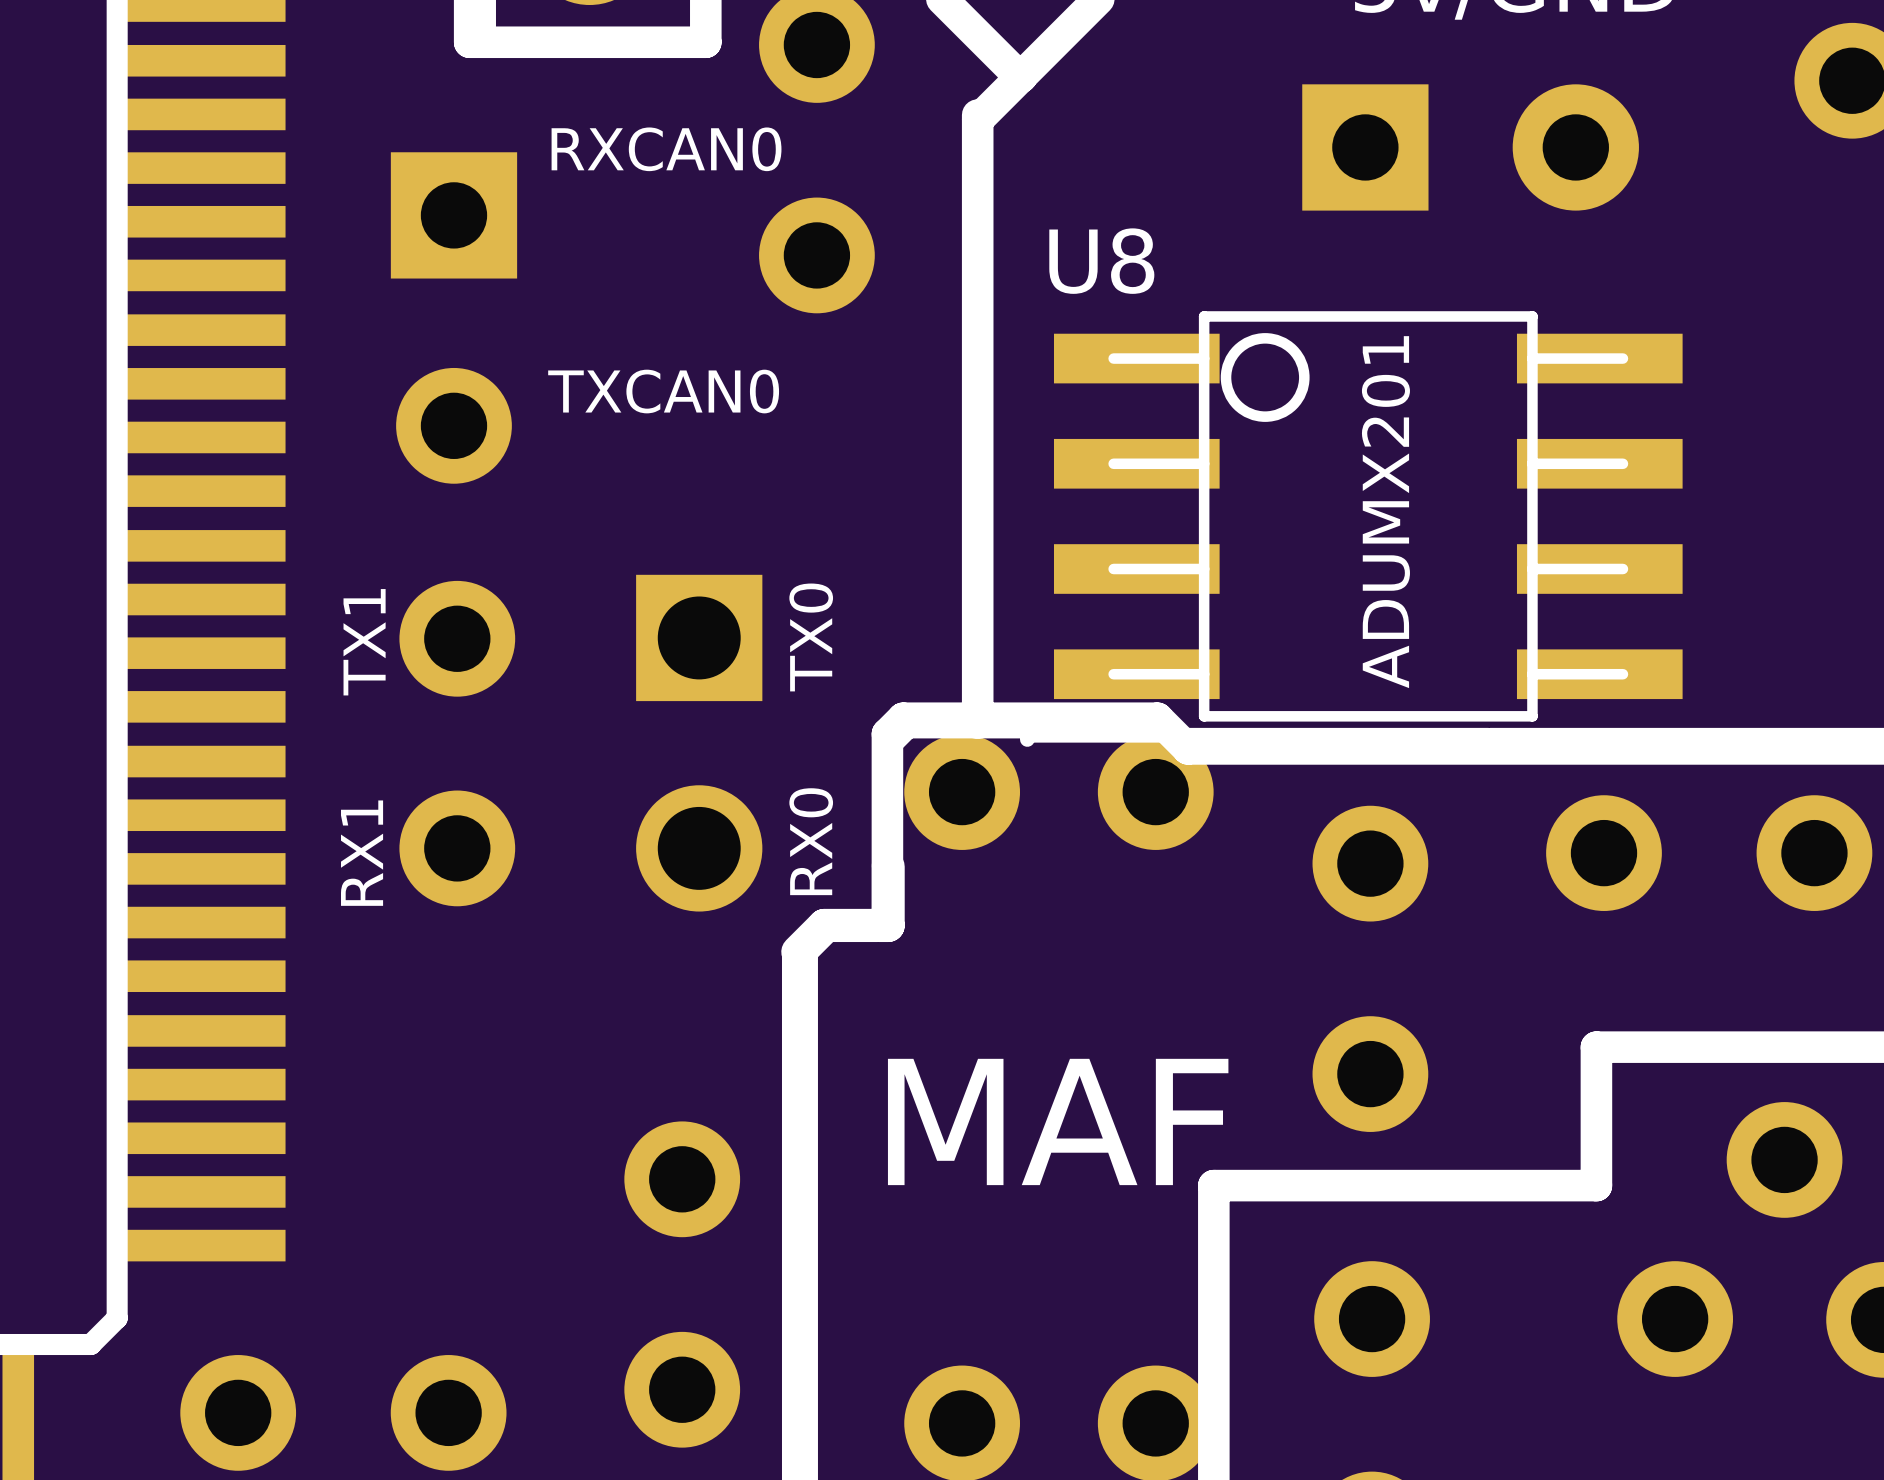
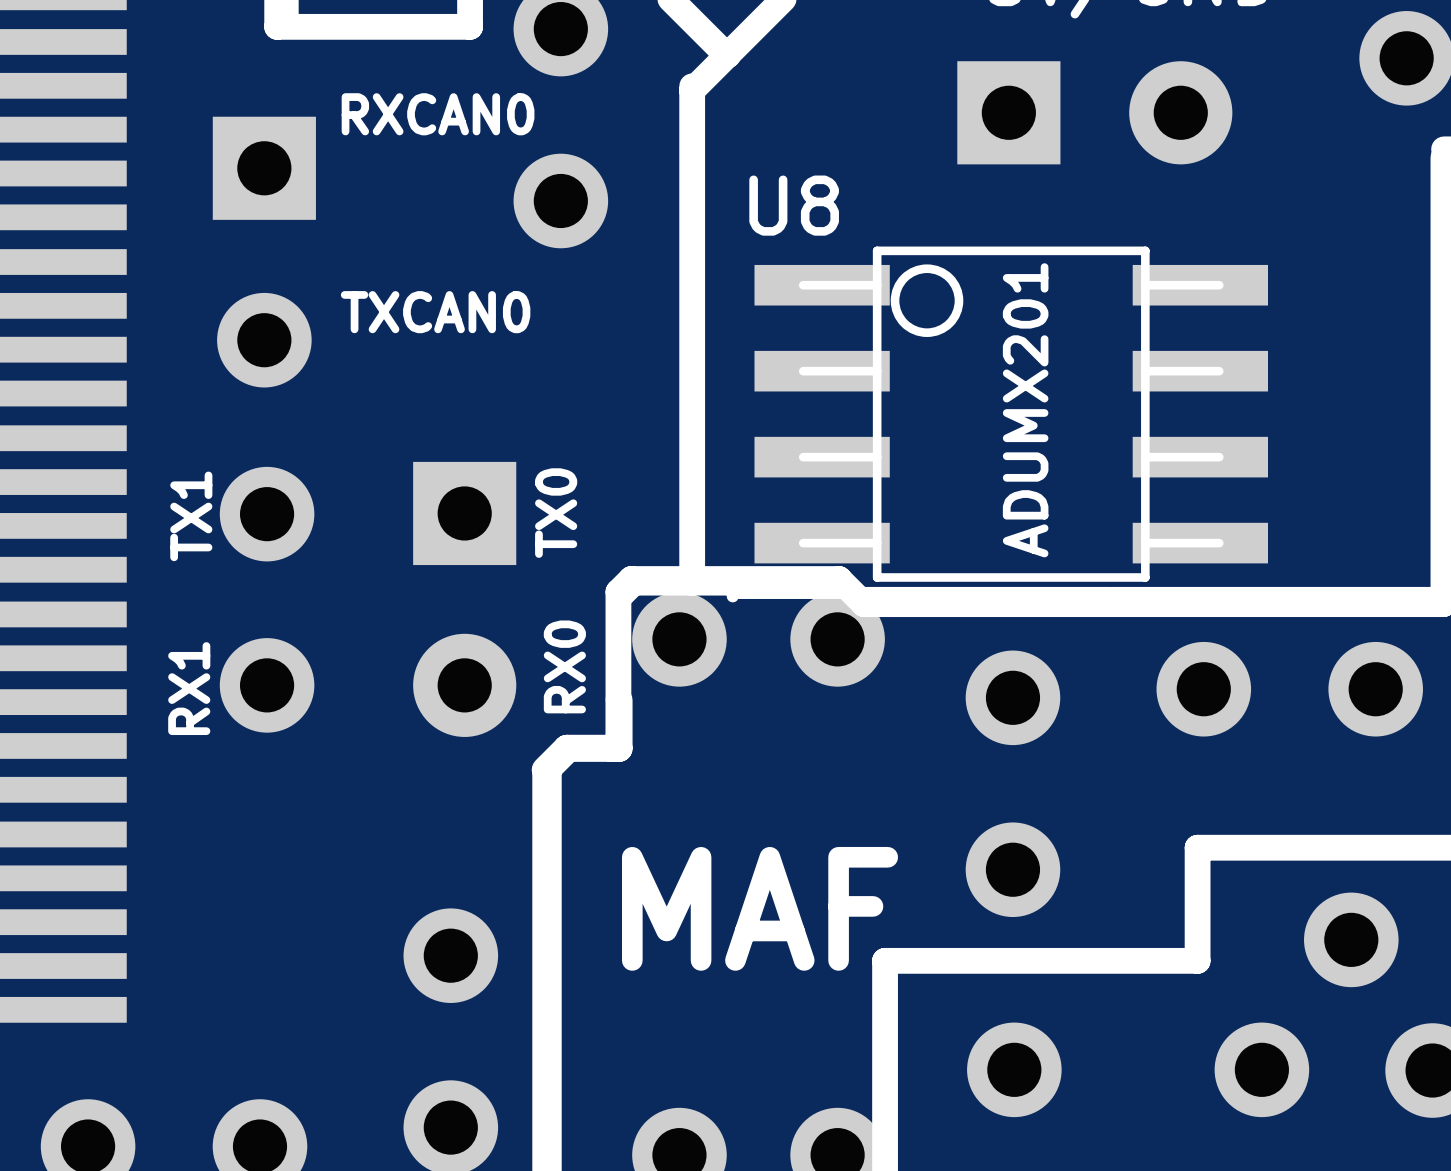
part footprint: [636, 574, 763, 912] -> [413, 461, 517, 737]
text position: RX0 (811, 841) -> RX0 (564, 666)

